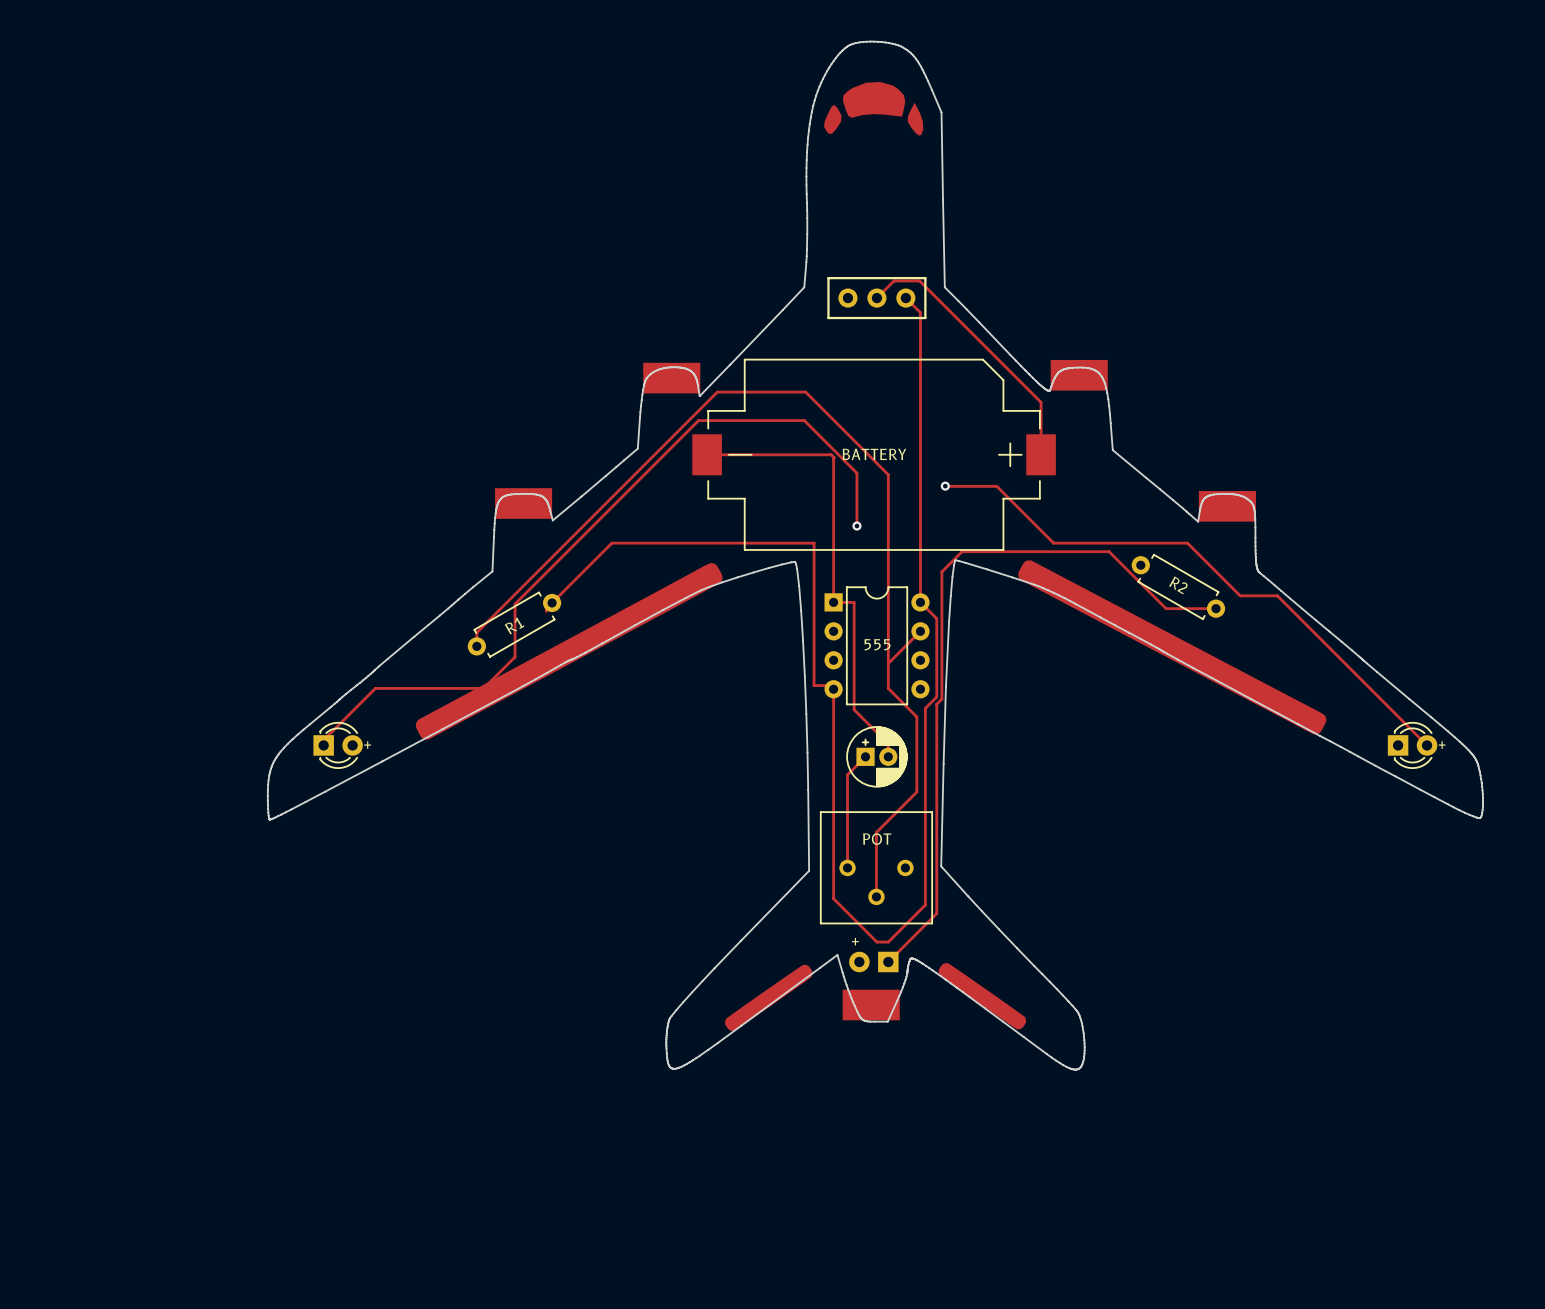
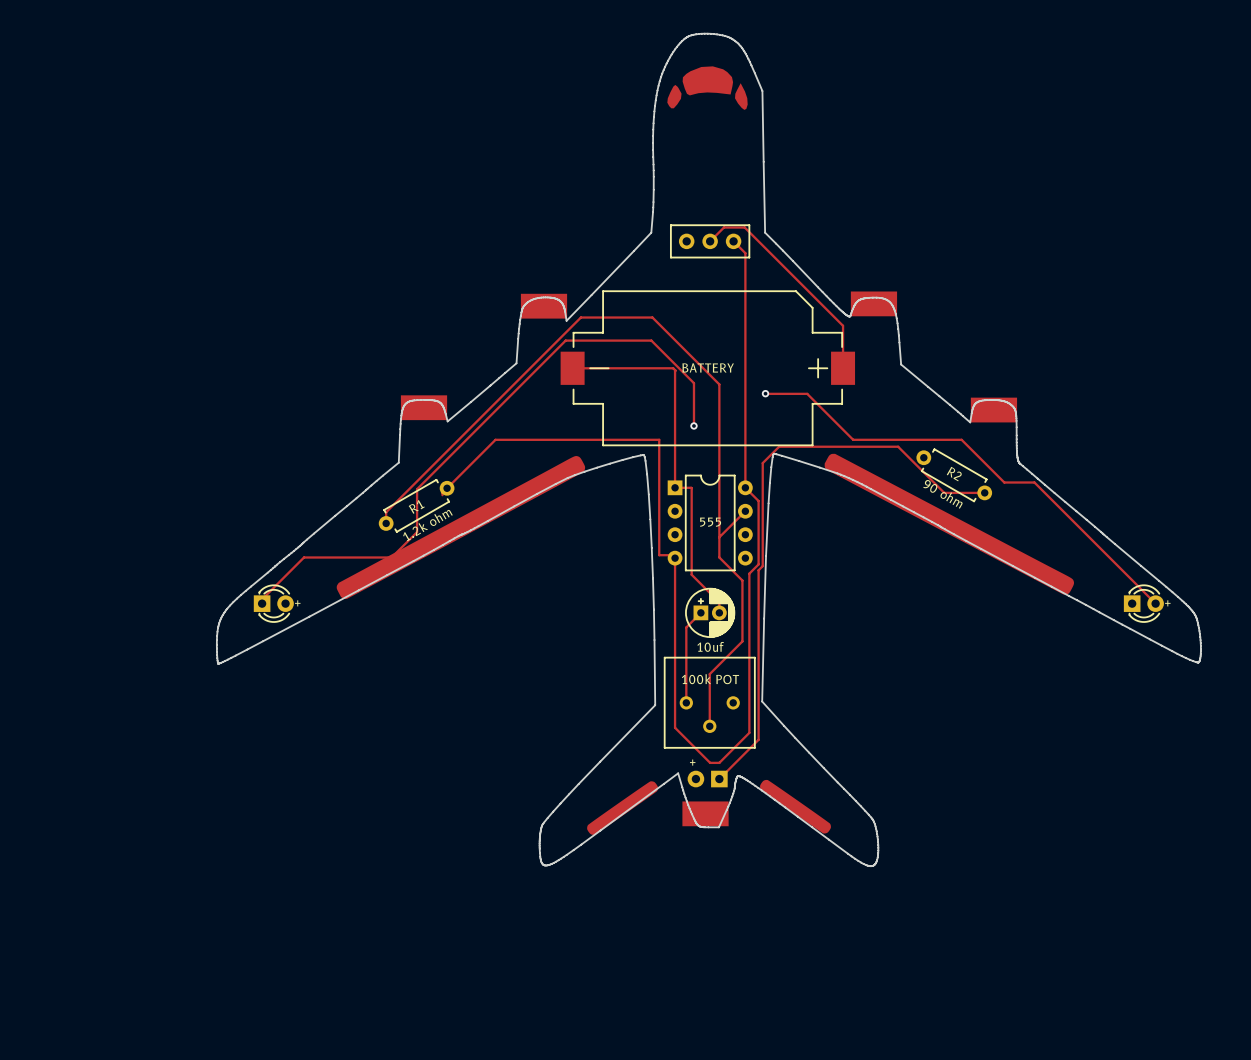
R2 value: none -> 90 ohm (942, 494)
R1 value: none -> 1.2k ohm (427, 525)
part value: none -> 10uf (710, 646)
part value: POT (877, 839) -> 100k POT (710, 679)

